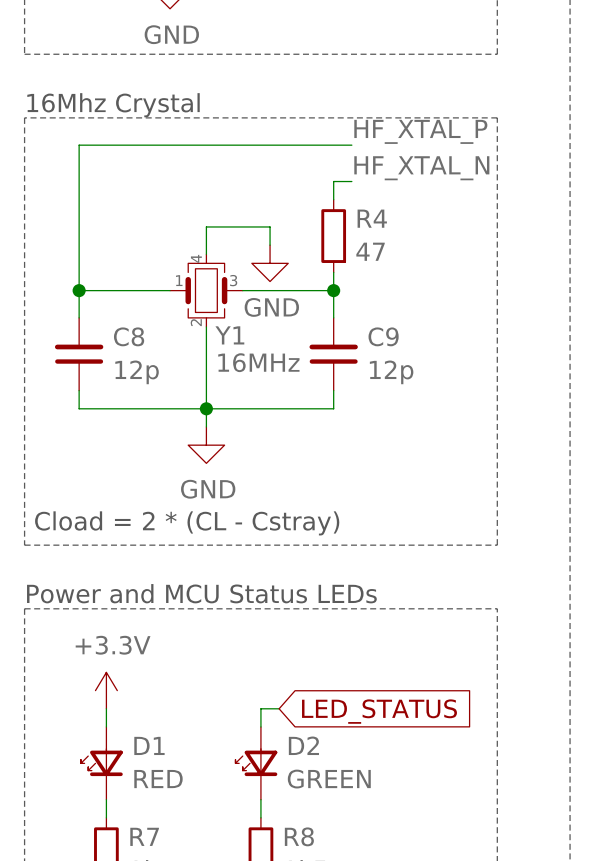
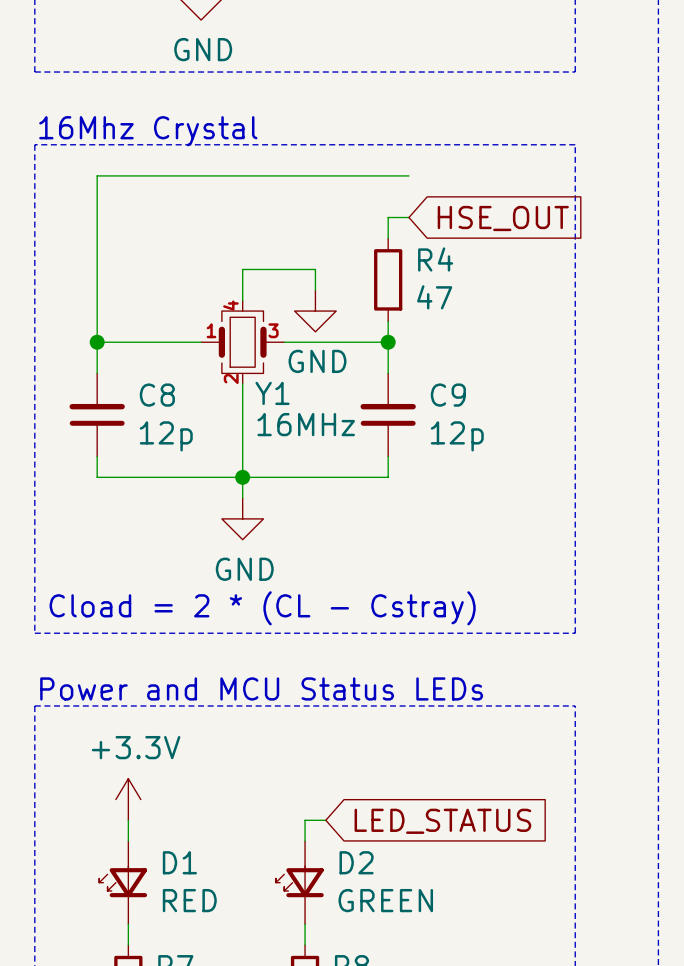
label: HF_XTAL_P (420, 131) -> none
label: HF_XTAL_N (421, 168) -> none
global label: none -> HSE_OUT (503, 218)

